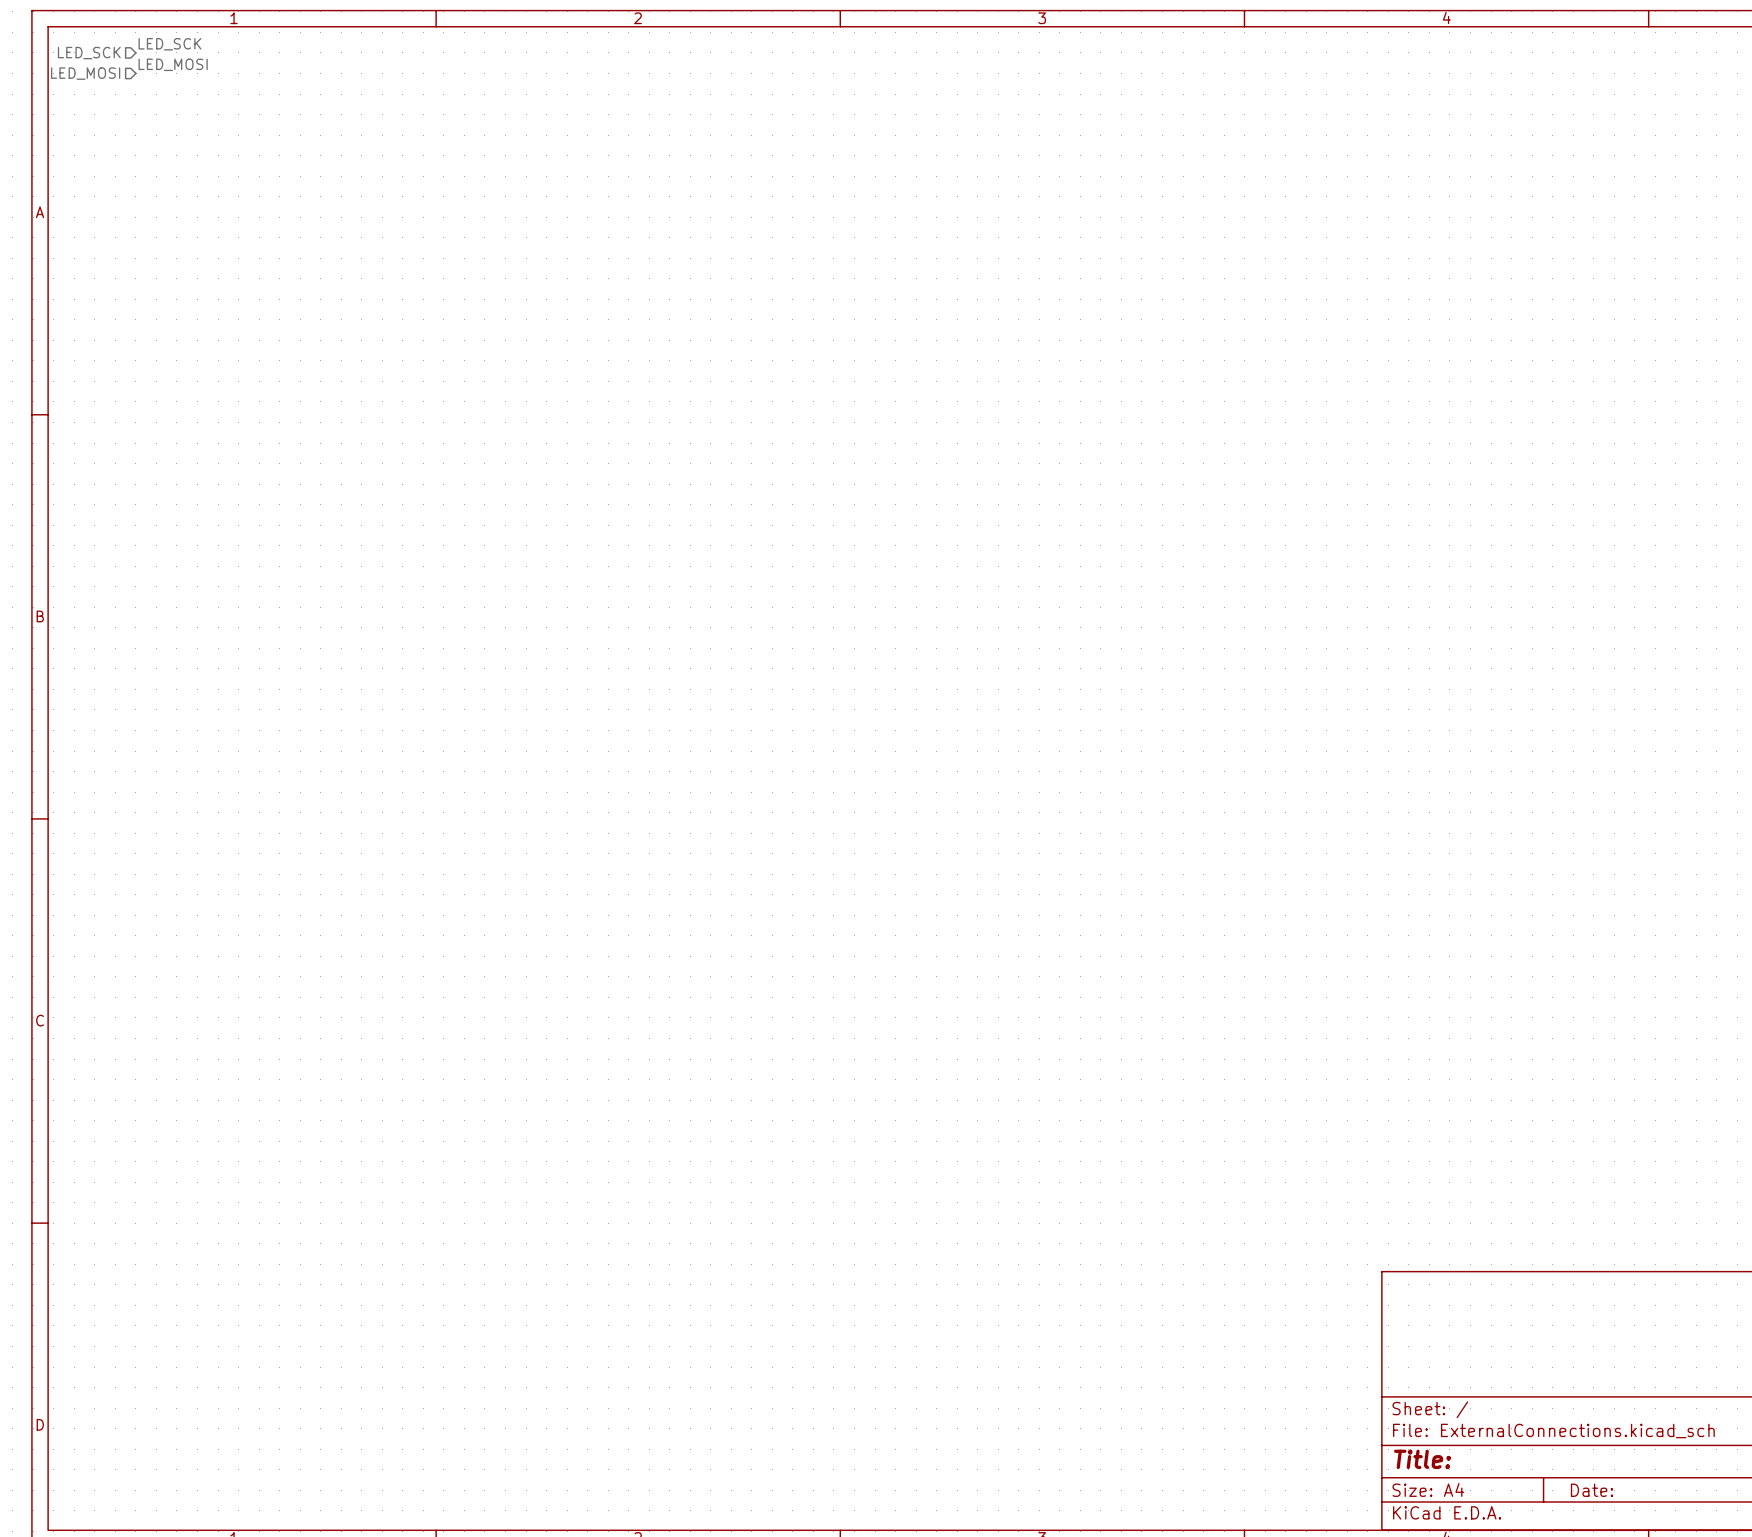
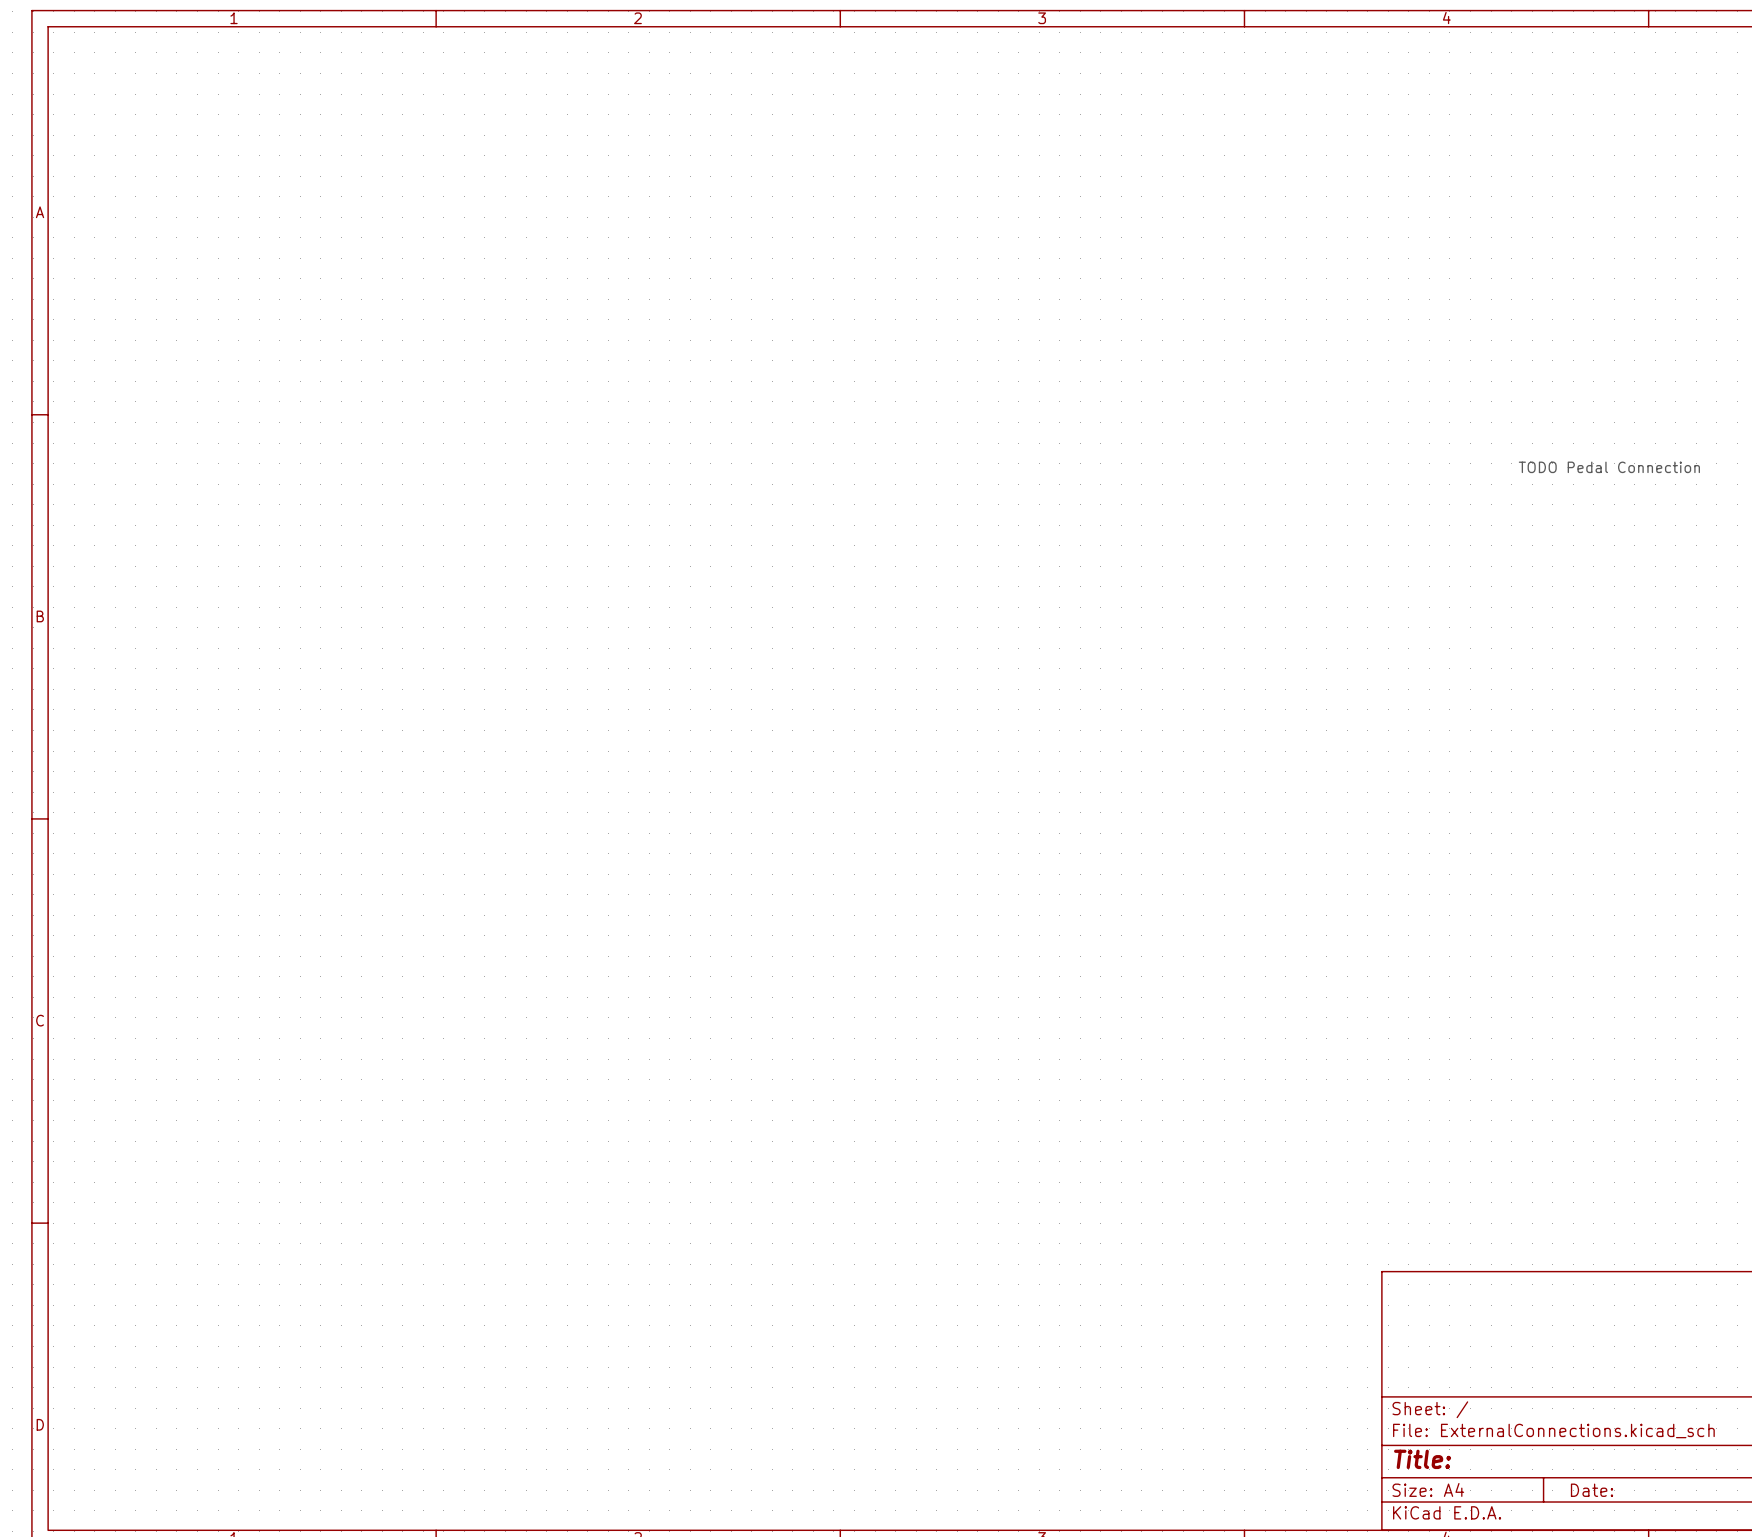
label: LED_SCK (169, 44) -> none
hierarchical label: LED_SCK (89, 53) -> none
label: LED_MOSI (173, 64) -> none
hierarchical label: LED_MOSI (85, 73) -> none
text: none -> TODO Pedal Connection (1609, 467)

